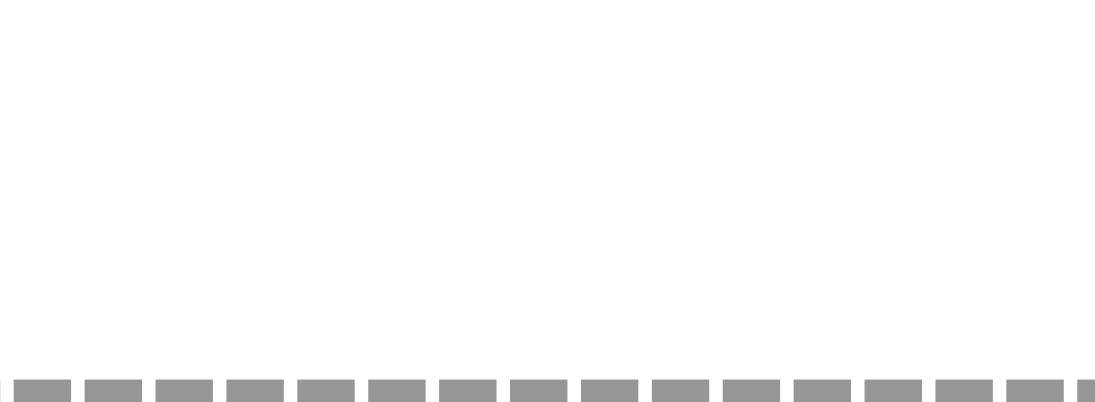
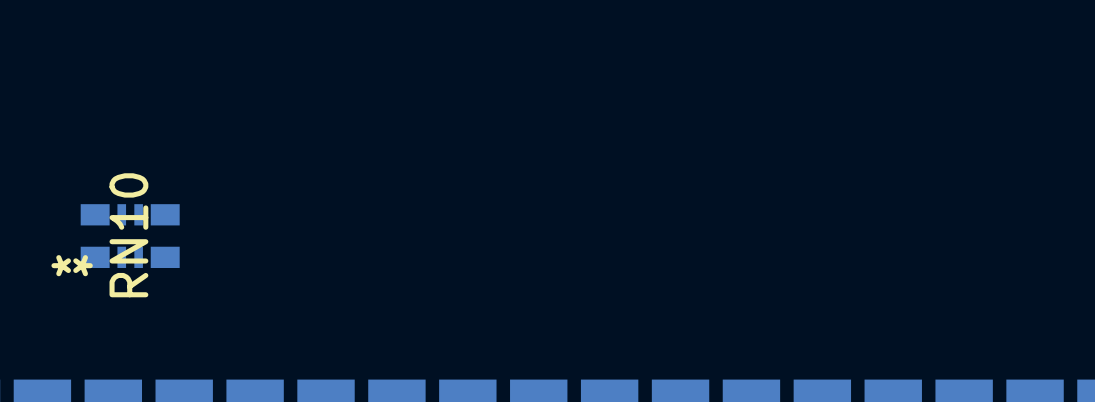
RN10: none -> (130, 236)

